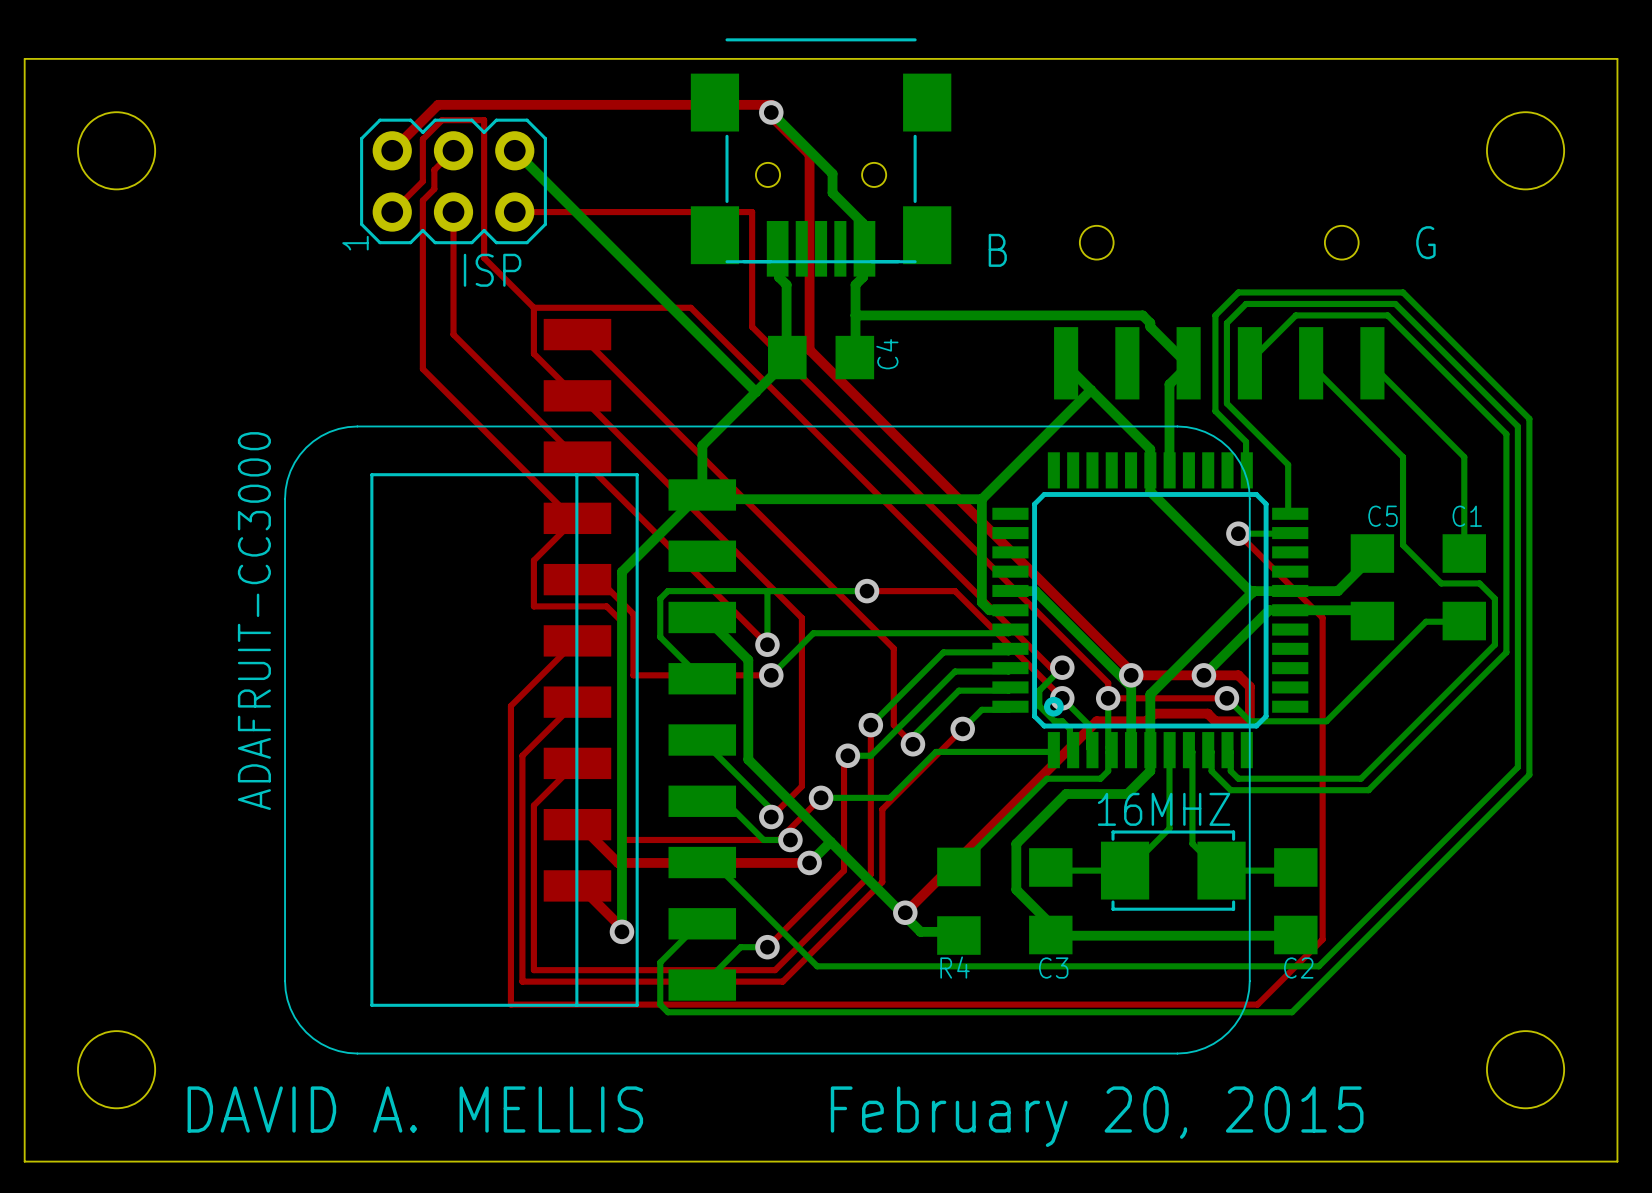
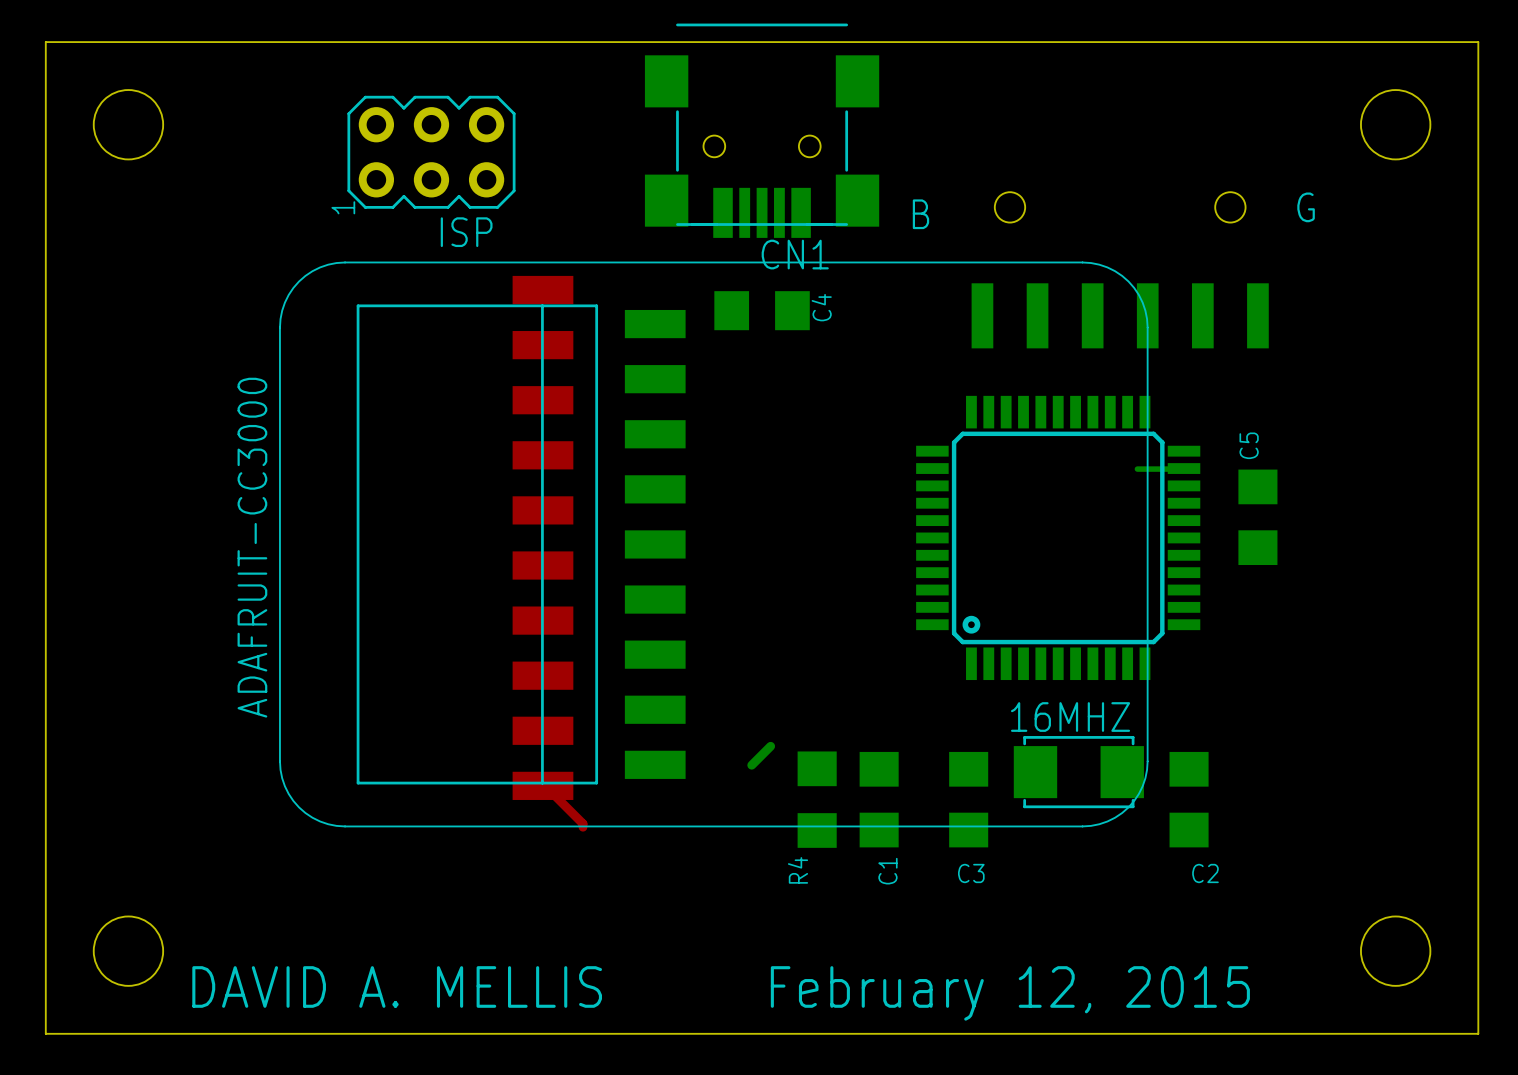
bottom track: (771, 112) (832, 173) (832, 192) (863, 223) (863, 277) (855, 284) (854, 357) -> none
via: (771, 112) -> none
top track: (392, 150) (438, 104) (771, 104) (771, 116) (809, 154) (809, 349) (1131, 671) (1131, 675) (1238, 675) (1249, 686) (1249, 721) (1215, 721) (1207, 713) (1154, 713) (1146, 721) (1096, 721) (905, 912) -> none
top track: (453, 150) (434, 169) (434, 189) (422, 200) (422, 369) (572, 518) (577, 518) -> none
bottom track: (514, 150) (755, 392) -> none
top track: (392, 212) (422, 181) (422, 139) (442, 120) (484, 120) (484, 258) (533, 307) -> none
top track: (453, 212) (453, 334) (576, 457) (579, 457) (767, 644) -> none
top track: (514, 212) (752, 212) (752, 326) (1108, 683) (1108, 698) (1226, 698) -> none
bottom track: (777, 248) (778, 277) (786, 284) (786, 361) (702, 445) (702, 494) -> none
CN1 name: none -> CN1 (795, 254)
top track: (533, 307) (533, 353) (576, 395) (579, 395) (801, 617) (801, 786) (771, 817) -> none
top track: (533, 307) (690, 307) (1050, 667) (1062, 667) -> none
bottom track: (855, 315) (1142, 315) (1150, 323) (1150, 326) (1188, 363) (1169, 384) (1169, 470) -> none
top track: (577, 334) (579, 334) (893, 648) (893, 725) (912, 744) -> none
bottom track: (1066, 363) (1150, 449) (1150, 491) (1251, 593) -> none
bottom track: (1249, 363) (1295, 315) (1387, 315) (1506, 434) (1506, 652) (1368, 790) (1230, 790) (1211, 771) (1211, 751) (1208, 750) -> none
bottom track: (1311, 363) (1403, 457) (1403, 545) (1441, 583) (1479, 583) (1494, 598) (1494, 644) (1360, 778) (1238, 778) (1230, 771) (1230, 751) (1227, 750) -> none
bottom track: (1372, 363) (1464, 457) (1464, 553) -> none
bottom track: (1090, 390) (981, 499) -> none
bottom track: (1246, 470) (1246, 441) (1215, 411) (1215, 315) (1238, 292) (1403, 292) (1529, 418) (1529, 774) (1292, 1012) (667, 1012) (660, 1004) (660, 962) (698, 924) (702, 923) -> none
bottom track: (702, 494) (698, 495) (621, 571) (621, 931) -> none
bottom track: (702, 494) (702, 499) (981, 499) -> none
bottom track: (981, 499) (981, 602) (989, 610) (1010, 610) -> none
bottom track: (1290, 513) (1288, 510) (1288, 464) (1226, 403) (1226, 323) (1246, 303) (1395, 303) (1517, 426) (1517, 767) (1318, 966) (817, 966) (713, 862) (702, 862) -> none
C5 name rotation: 0° (1383, 516) -> 90° counterclockwise (1249, 445)
C1 name rotation: 0° (1467, 516) -> 90° counterclockwise (887, 871)
C1 name position: C1 (1467, 516) -> C1 (887, 871)
top track: (576, 518) (533, 560) (533, 606) (606, 606) (621, 621) (621, 839) (778, 839) (821, 797) -> none
top track: (1238, 533) (1322, 617) (1322, 939) (1257, 1004) (510, 1004) (510, 705) (577, 640) -> none
via: (1238, 533) -> none
bottom track: (1372, 553) (1372, 556) (1337, 591) (1253, 591) (1150, 694) (1150, 771) (1127, 794) (1066, 794) (1016, 843) (1016, 889) (1050, 924) (1050, 935) (1295, 935) -> none
top track: (577, 579) (598, 579) (633, 614) (633, 675) (771, 675) -> none
C1 position: (1464, 587) -> (879, 799)
bottom track: (1010, 590) (1035, 591) (1131, 686) (1131, 750) -> none
bottom track: (767, 591) (767, 644) -> none
bottom track: (867, 591) (667, 591) (660, 598) (660, 637) (702, 678) -> none
top track: (867, 591) (955, 591) (1062, 698) -> none
via: (867, 591) -> none
bottom track: (702, 617) (702, 614) (748, 660) (748, 759) (920, 931) (958, 931) (958, 935) -> none
bottom track: (1372, 621) (1372, 617) (1364, 610) (1269, 610) (1203, 675) -> none
bottom track: (1464, 621) (1426, 621) (1326, 721) (1249, 721) (1226, 698) -> none
bottom track: (1010, 629) (1008, 633) (813, 633) (771, 675) -> none
via: (767, 644) -> none
bottom track: (1010, 648) (1008, 652) (943, 652) (870, 725) -> none
bottom track: (1062, 667) (1039, 690) (1039, 705) (1054, 721) (1062, 721) (1069, 728) (1069, 748) (1073, 750) -> none
via: (1062, 667) -> none
bottom track: (1010, 668) (1008, 671) (955, 671) (870, 755) (847, 755) -> none
via: (771, 675) -> none
via: (1131, 675) -> none
via: (1203, 675) -> none
bottom track: (1010, 687) (1008, 690) (958, 690) (912, 736) (912, 744) -> none
bottom track: (1062, 698) (1089, 725) (1089, 748) (1092, 750) -> none
via: (1062, 698) -> none
bottom track: (1108, 698) (1108, 748) (1111, 750) (1108, 751) (1108, 771) (1100, 778) (1046, 778) (958, 866) -> none
via: (1108, 698) -> none
via: (1226, 698) -> none
top track: (577, 702) (522, 755) (522, 981) (782, 981) (882, 882) (882, 809) (962, 728) -> none
bottom track: (1010, 706) (1008, 709) (981, 709) (962, 728) -> none
top track: (870, 725) (870, 874) (775, 970) (533, 970) (533, 805) (577, 763) -> none
via: (870, 725) -> none
via: (962, 728) -> none
bottom track: (702, 740) (771, 809) (771, 817) -> none
part position: (767, 740) -> (713, 544)
via: (912, 744) -> none
bottom track: (1169, 748) (1169, 828) (1127, 870) (1050, 870) (1050, 867) -> none
bottom track: (1188, 748) (1192, 751) (1192, 843) (1219, 870) (1295, 870) (1295, 867) -> none
bottom track: (1053, 750) (1050, 751) (935, 751) (889, 797) (821, 797) -> none
top track: (847, 755) (844, 759) (844, 870) (767, 947) -> none
via: (847, 755) -> none
via: (821, 797) -> none
bottom track: (702, 801) (725, 801) (763, 839) (790, 839) -> none
via: (771, 817) -> none
top track: (577, 824) (579, 824) (618, 862) (809, 862) -> none
via: (790, 839) -> none
via: (809, 862) -> none
R4 position: (958, 901) -> (817, 799)
via: (905, 912) -> none
via: (621, 931) -> none
bottom track: (767, 947) (740, 947) (702, 985) -> none
via: (767, 947) -> none
R4 name rotation: 0° (955, 967) -> 90° counterclockwise (798, 870)
C3 name position: C3 (1053, 968) -> C3 (971, 873)
C2 name position: C2 (1298, 968) -> C2 (1205, 873)
text: February 20, 2015 (1097, 1116) -> February 12, 2015 (1010, 993)

